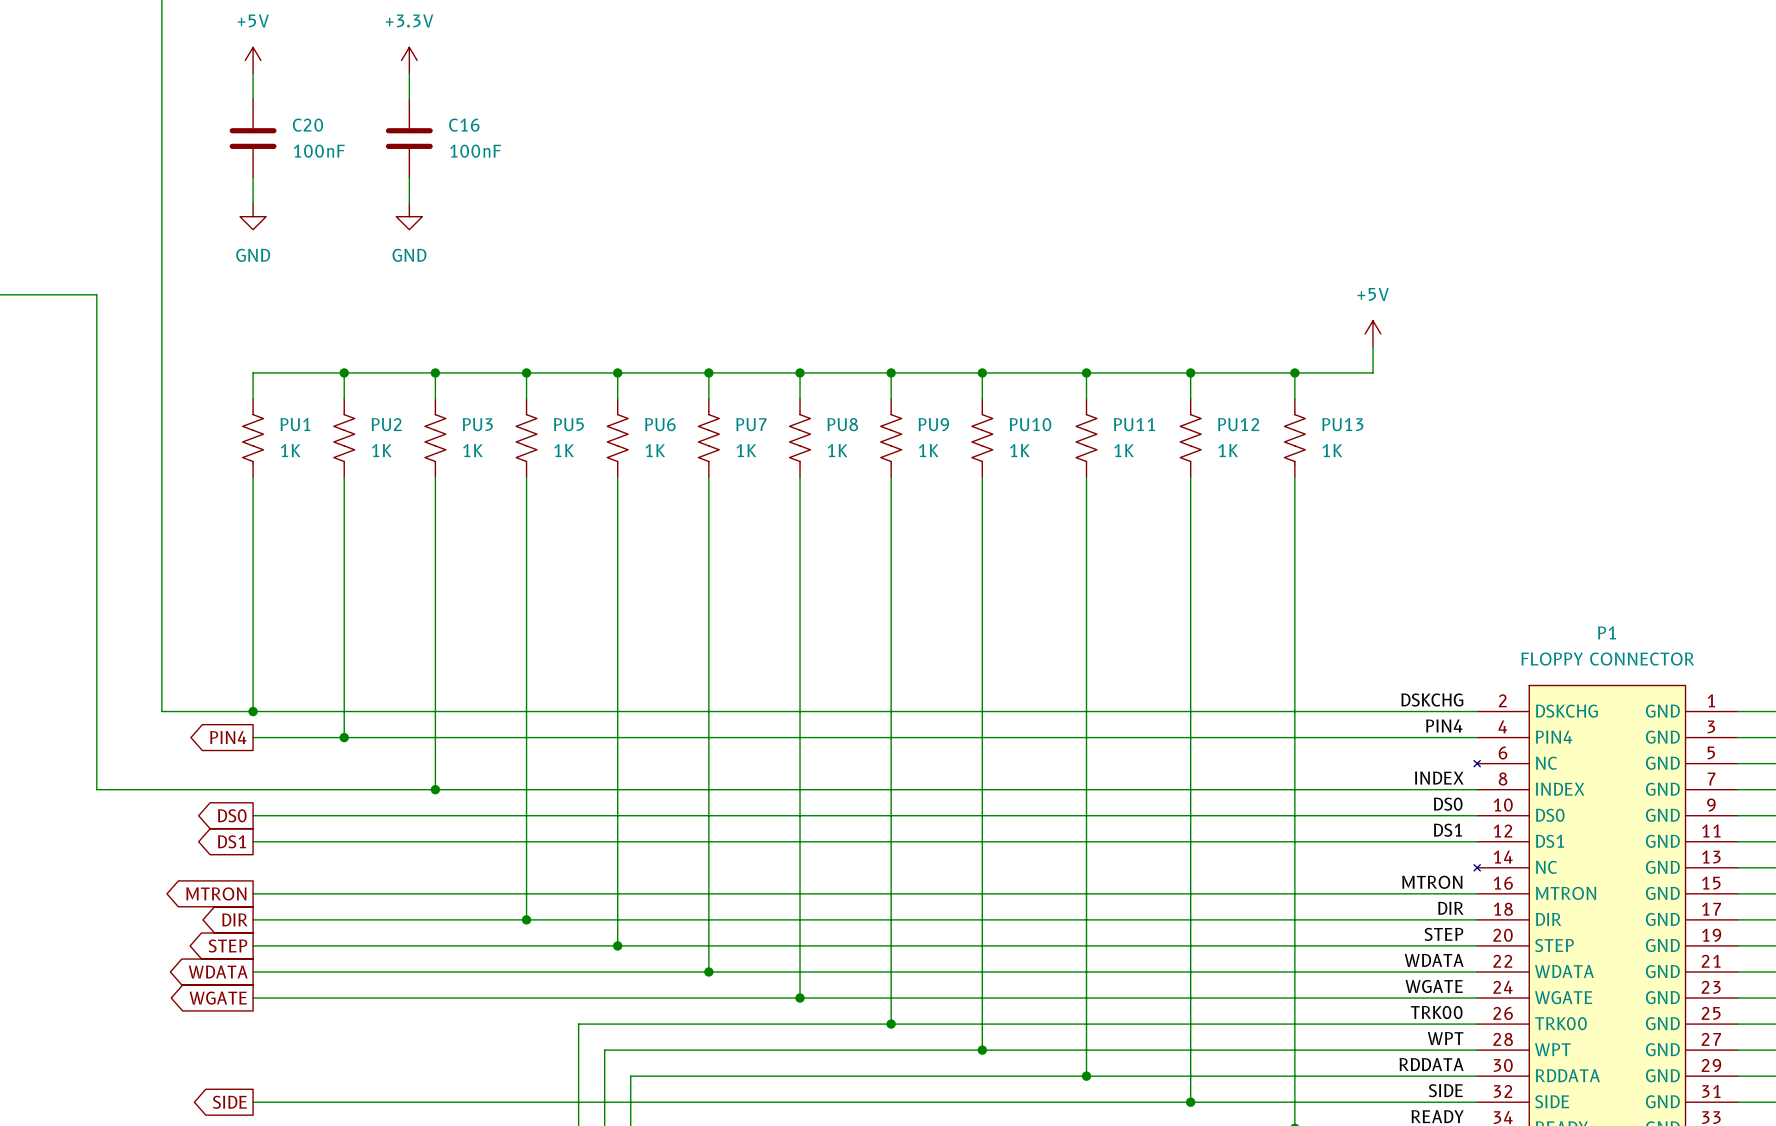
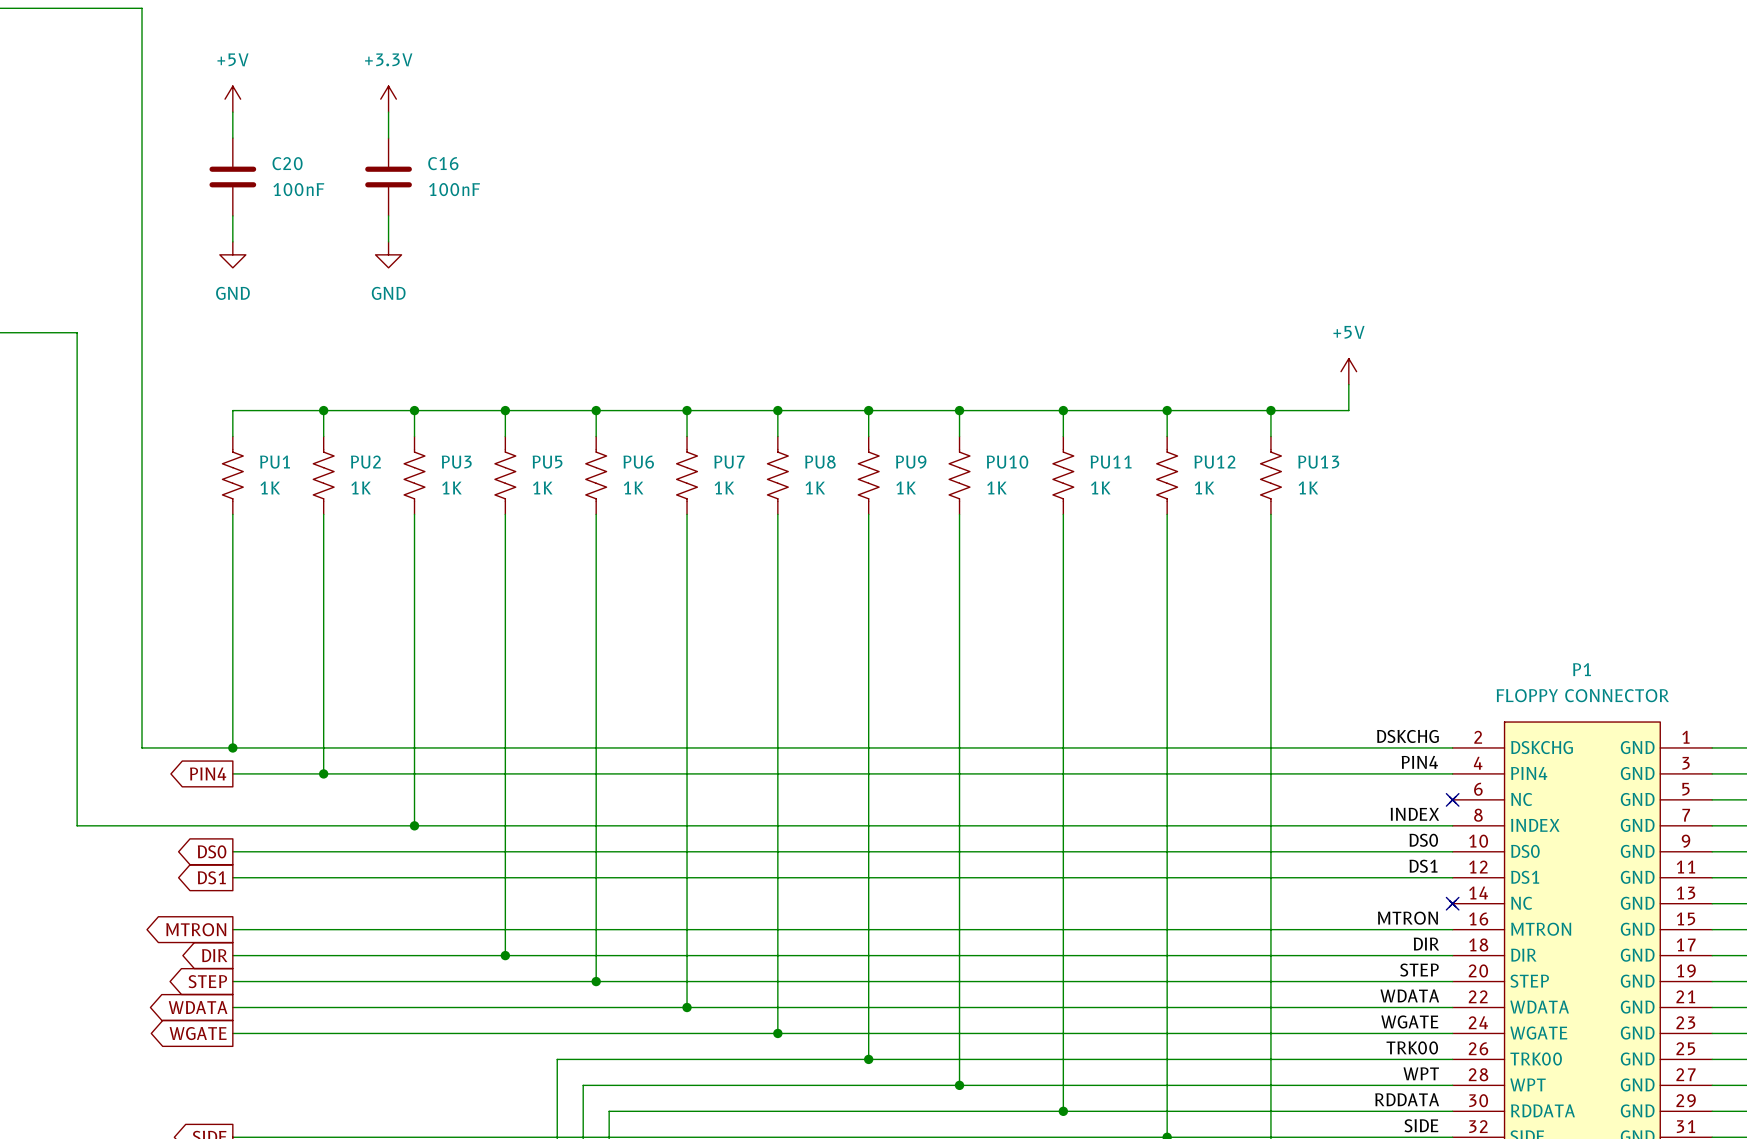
no-connect mark: none -> (1452, 799)
no-connect mark: none -> (1452, 903)

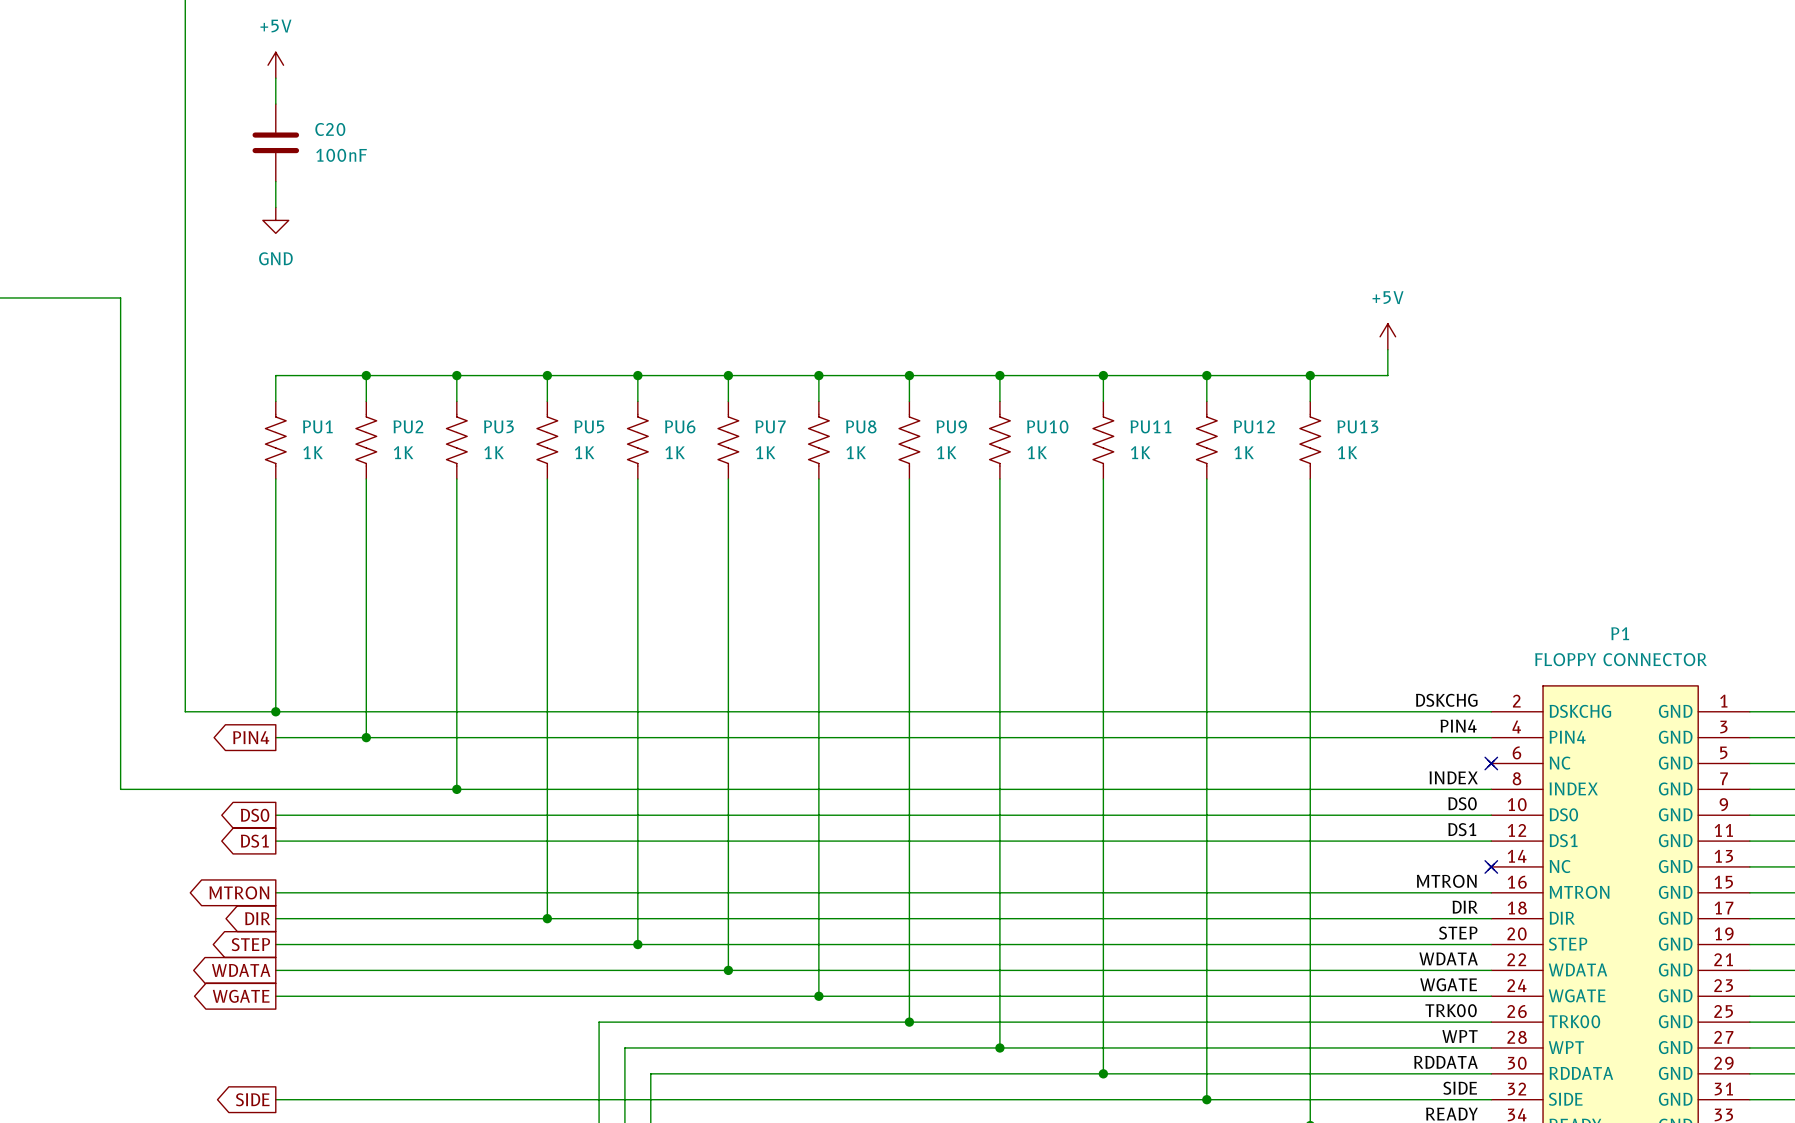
power symbol: +3.3V (388, 99) -> none
wire: (388, 112) (388, 138) -> none
C16: 100nF (388, 177) -> none
wire: (388, 215) (388, 241) -> none
power symbol: GND (388, 254) -> none

